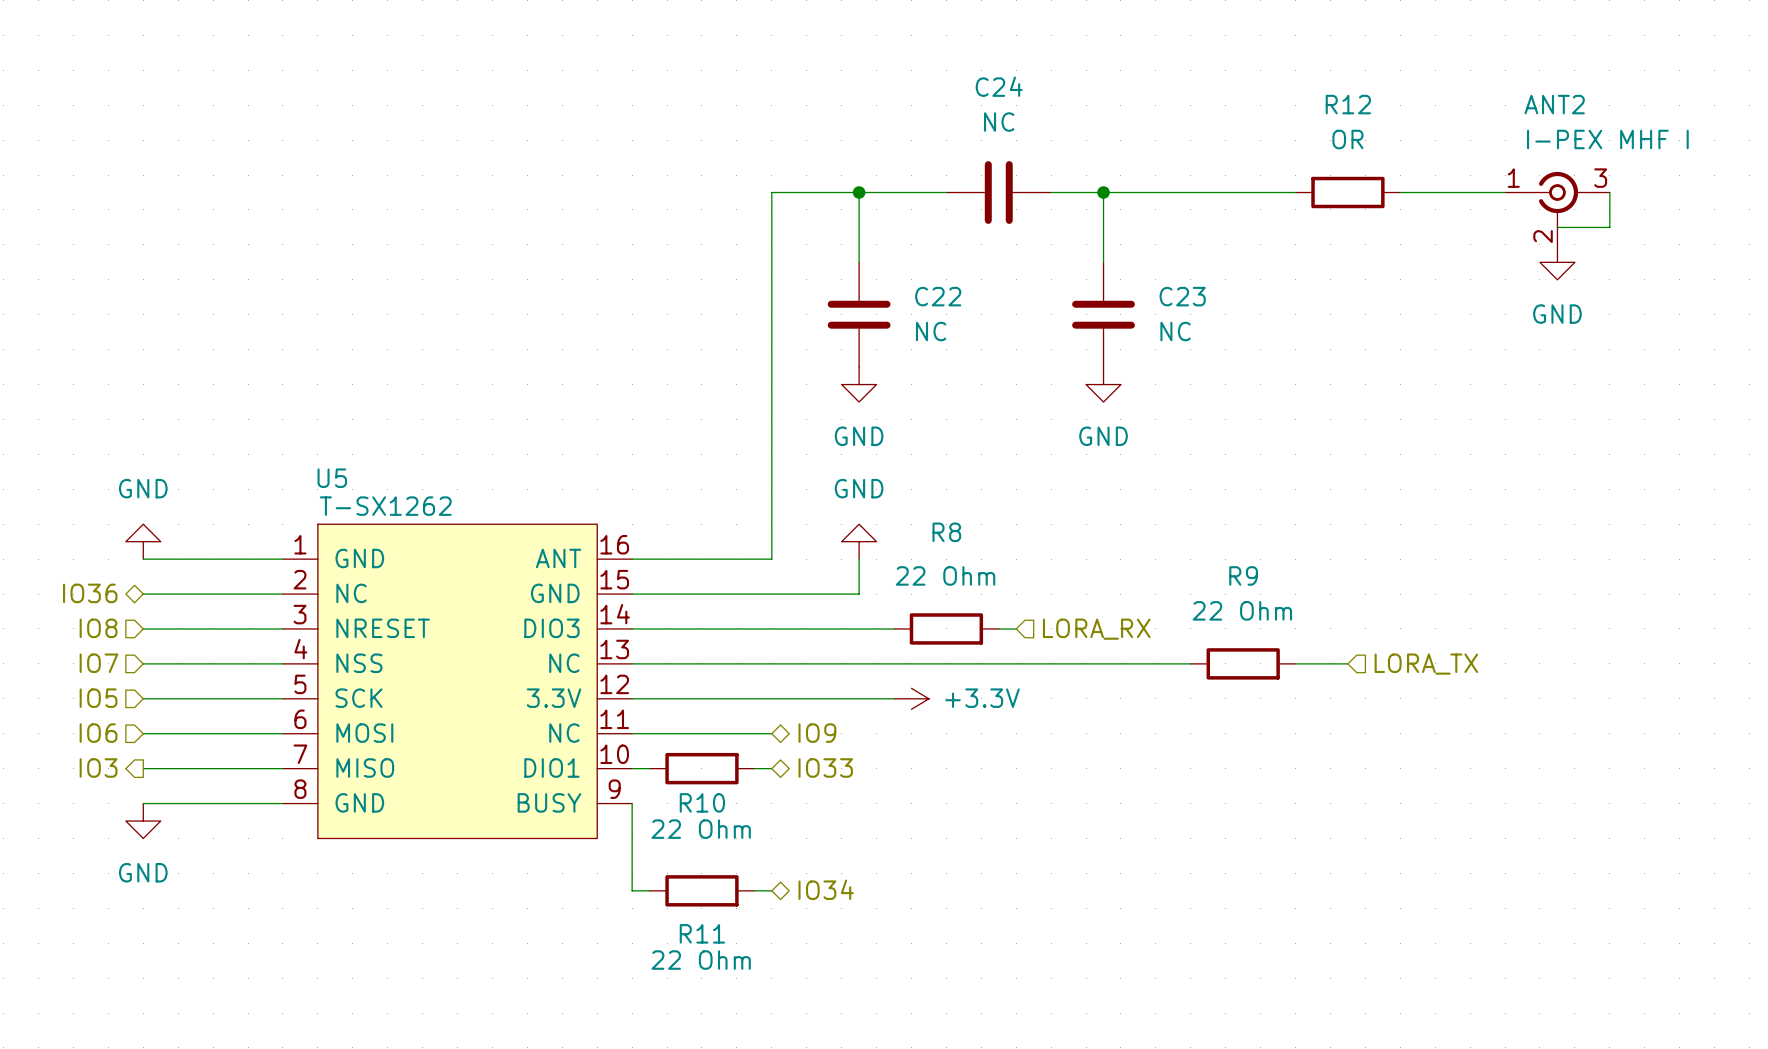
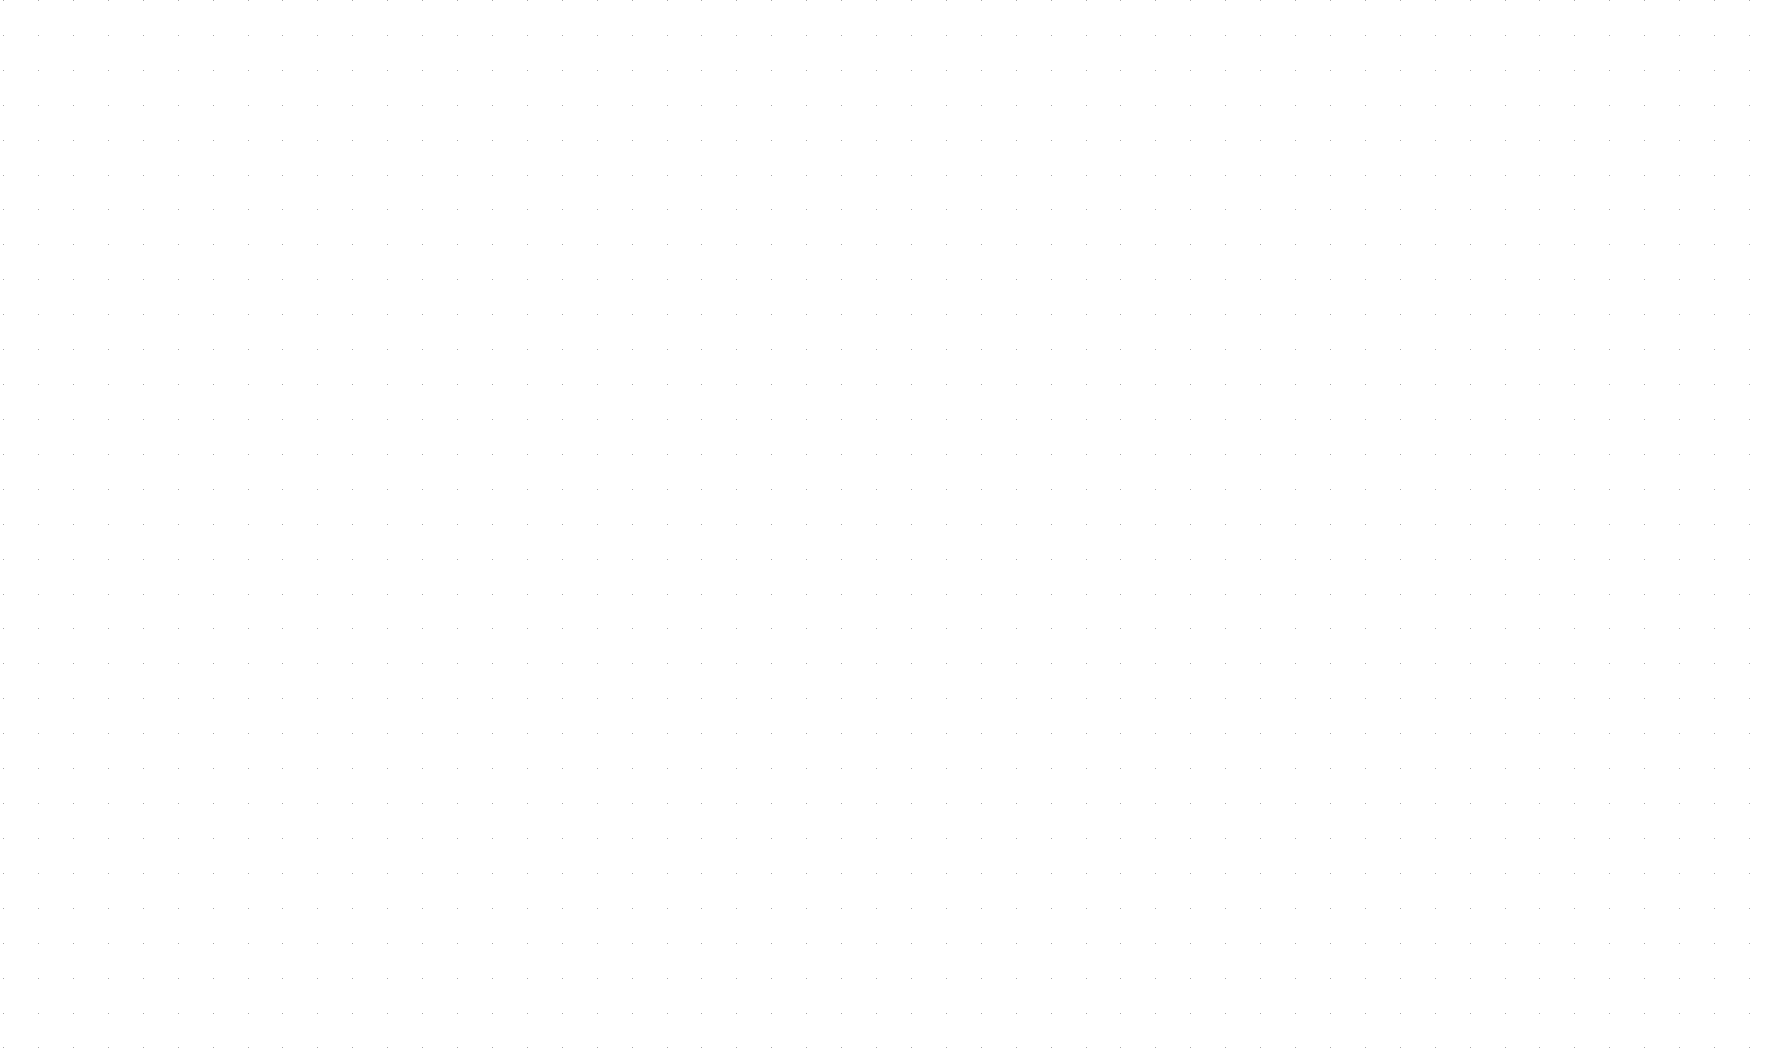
wire: (859, 192) (859, 262) -> none
junction: (859, 192) -> none
wire: (946, 192) (771, 192) (771, 559) (632, 559) -> none
C24: NC (998, 192) -> none
wire: (1051, 192) (1295, 192) -> none
wire: (1103, 192) (1103, 262) -> none
junction: (1103, 192) -> none
R12: OR (1347, 192) -> none
wire: (1400, 192) (1505, 192) -> none
wire: (1609, 192) (1609, 227) (1557, 227) -> none
ANT2: I-PEX MHF I (1557, 208) -> none
power symbol: GND (1557, 262) -> none
C22: NC (859, 314) -> none
C23: NC (1103, 314) -> none
power symbol: GND (859, 384) -> none
power symbol: GND (1103, 384) -> none
power symbol: GND (143, 541) -> none
power symbol: GND (859, 541) -> none
wire: (143, 559) (282, 559) -> none
wire: (859, 559) (859, 594) (632, 594) -> none
hierarchical label: IO36 (90, 593) -> none
wire: (143, 594) (282, 594) -> none
hierarchical label: IO8 (98, 628) -> none
wire: (143, 628) (282, 628) -> none
wire: (632, 628) (894, 628) -> none
R8: 22 Ohm (946, 628) -> none
wire: (998, 628) (1016, 628) -> none
hierarchical label: LORA_RX (1096, 629) -> none
hierarchical label: IO7 (98, 663) -> none
wire: (143, 663) (282, 663) -> none
wire: (632, 663) (1190, 663) -> none
R9: 22 Ohm (1243, 663) -> none
wire: (1295, 663) (1347, 663) -> none
hierarchical label: LORA_TX (1426, 664) -> none
U5: T-SX1262 (457, 681) -> none
hierarchical label: IO5 (98, 698) -> none
wire: (143, 698) (282, 698) -> none
wire: (632, 698) (894, 698) -> none
power symbol: +3.3V (911, 698) -> none
hierarchical label: IO6 (98, 733) -> none
wire: (143, 733) (282, 733) -> none
wire: (632, 733) (771, 733) -> none
hierarchical label: IO9 (817, 733) -> none
hierarchical label: IO3 (98, 767) -> none
hierarchical label: IO33 (825, 767) -> none
wire: (143, 768) (282, 768) -> none
wire: (632, 768) (649, 768) -> none
R10: 22 Ohm (701, 768) -> none
wire: (754, 768) (771, 768) -> none
wire: (143, 803) (282, 803) -> none
wire: (632, 803) (632, 890) (649, 890) -> none
power symbol: GND (143, 821) -> none
hierarchical label: IO34 (826, 889) -> none
R11: 22 Ohm (701, 890) -> none
wire: (754, 890) (771, 890) -> none

